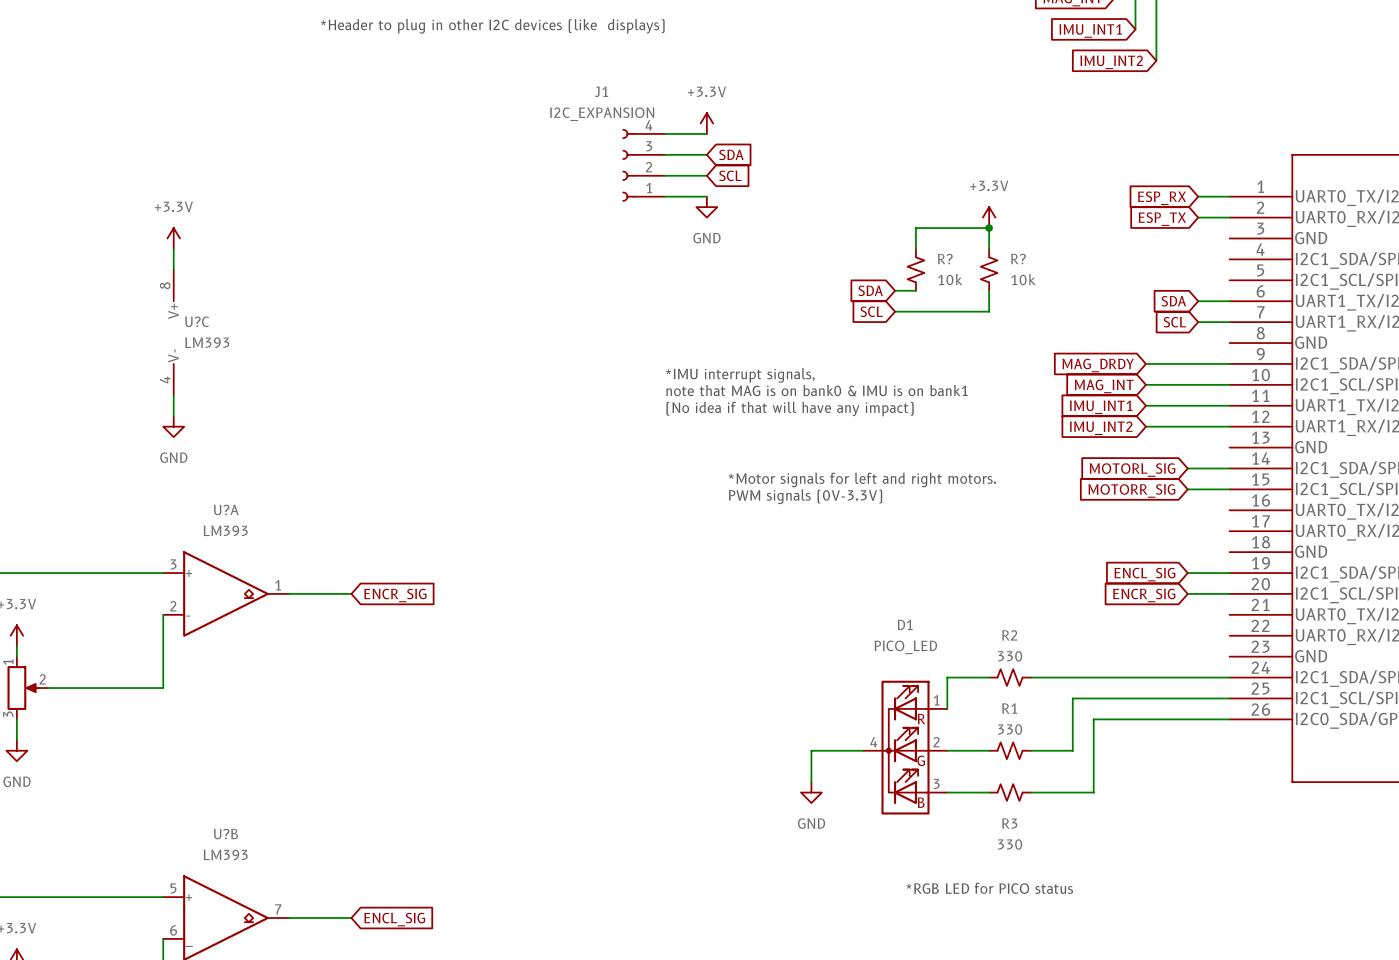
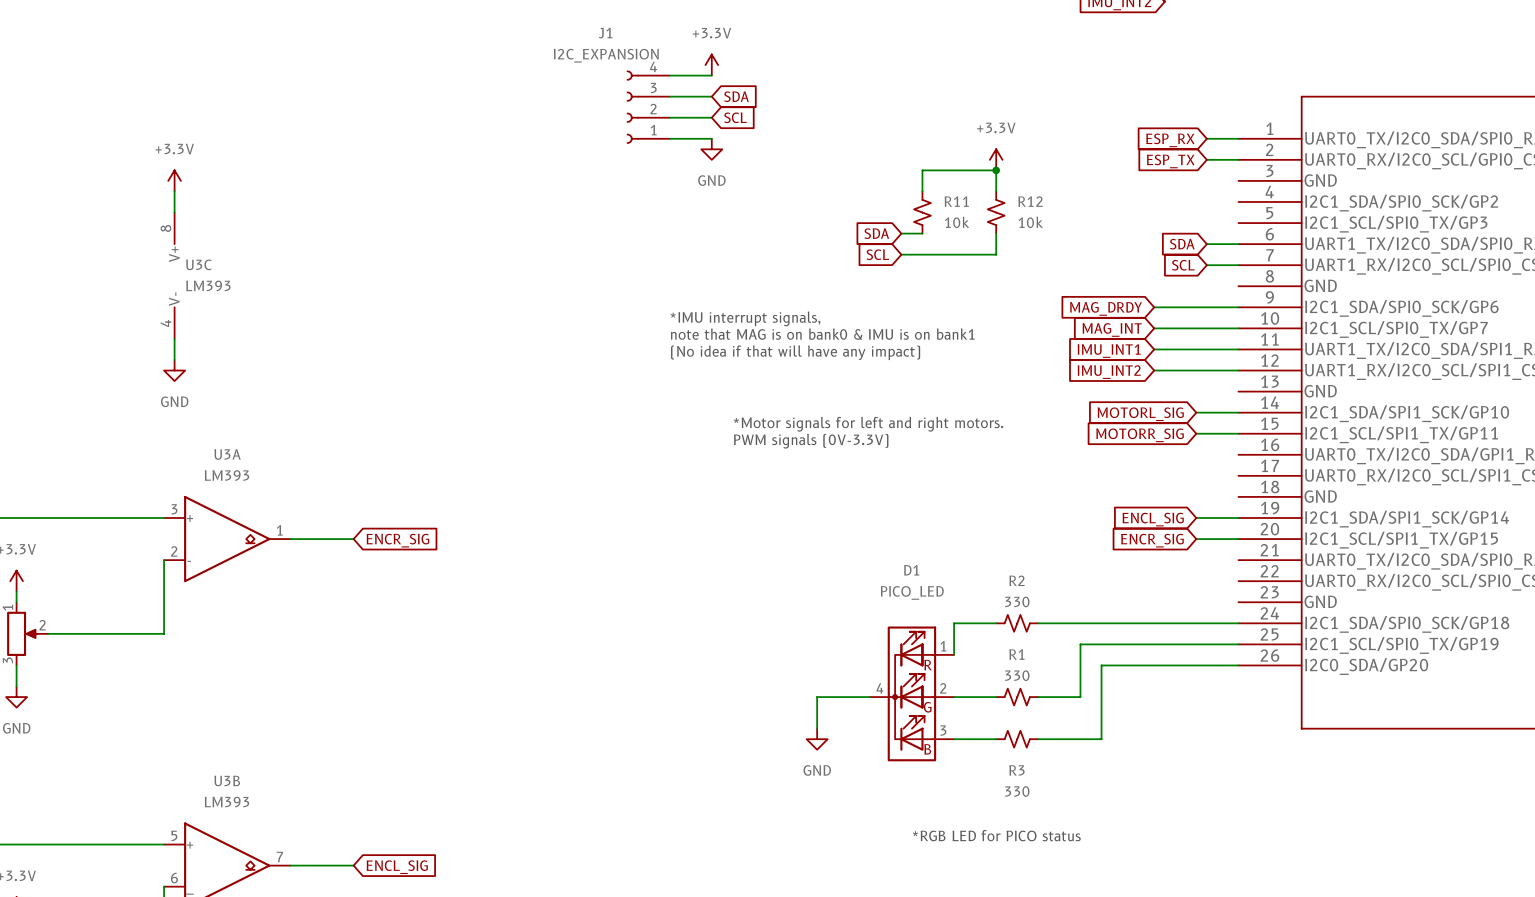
R? name: R? (945, 259) -> R11 (956, 201)
R? name: R? (1018, 259) -> R12 (1030, 201)
U?C name: U?C (197, 321) -> U3C (198, 264)
U?A name: U?A (226, 509) -> U3A (227, 454)
U?B name: U?B (225, 834) -> U3B (227, 781)

